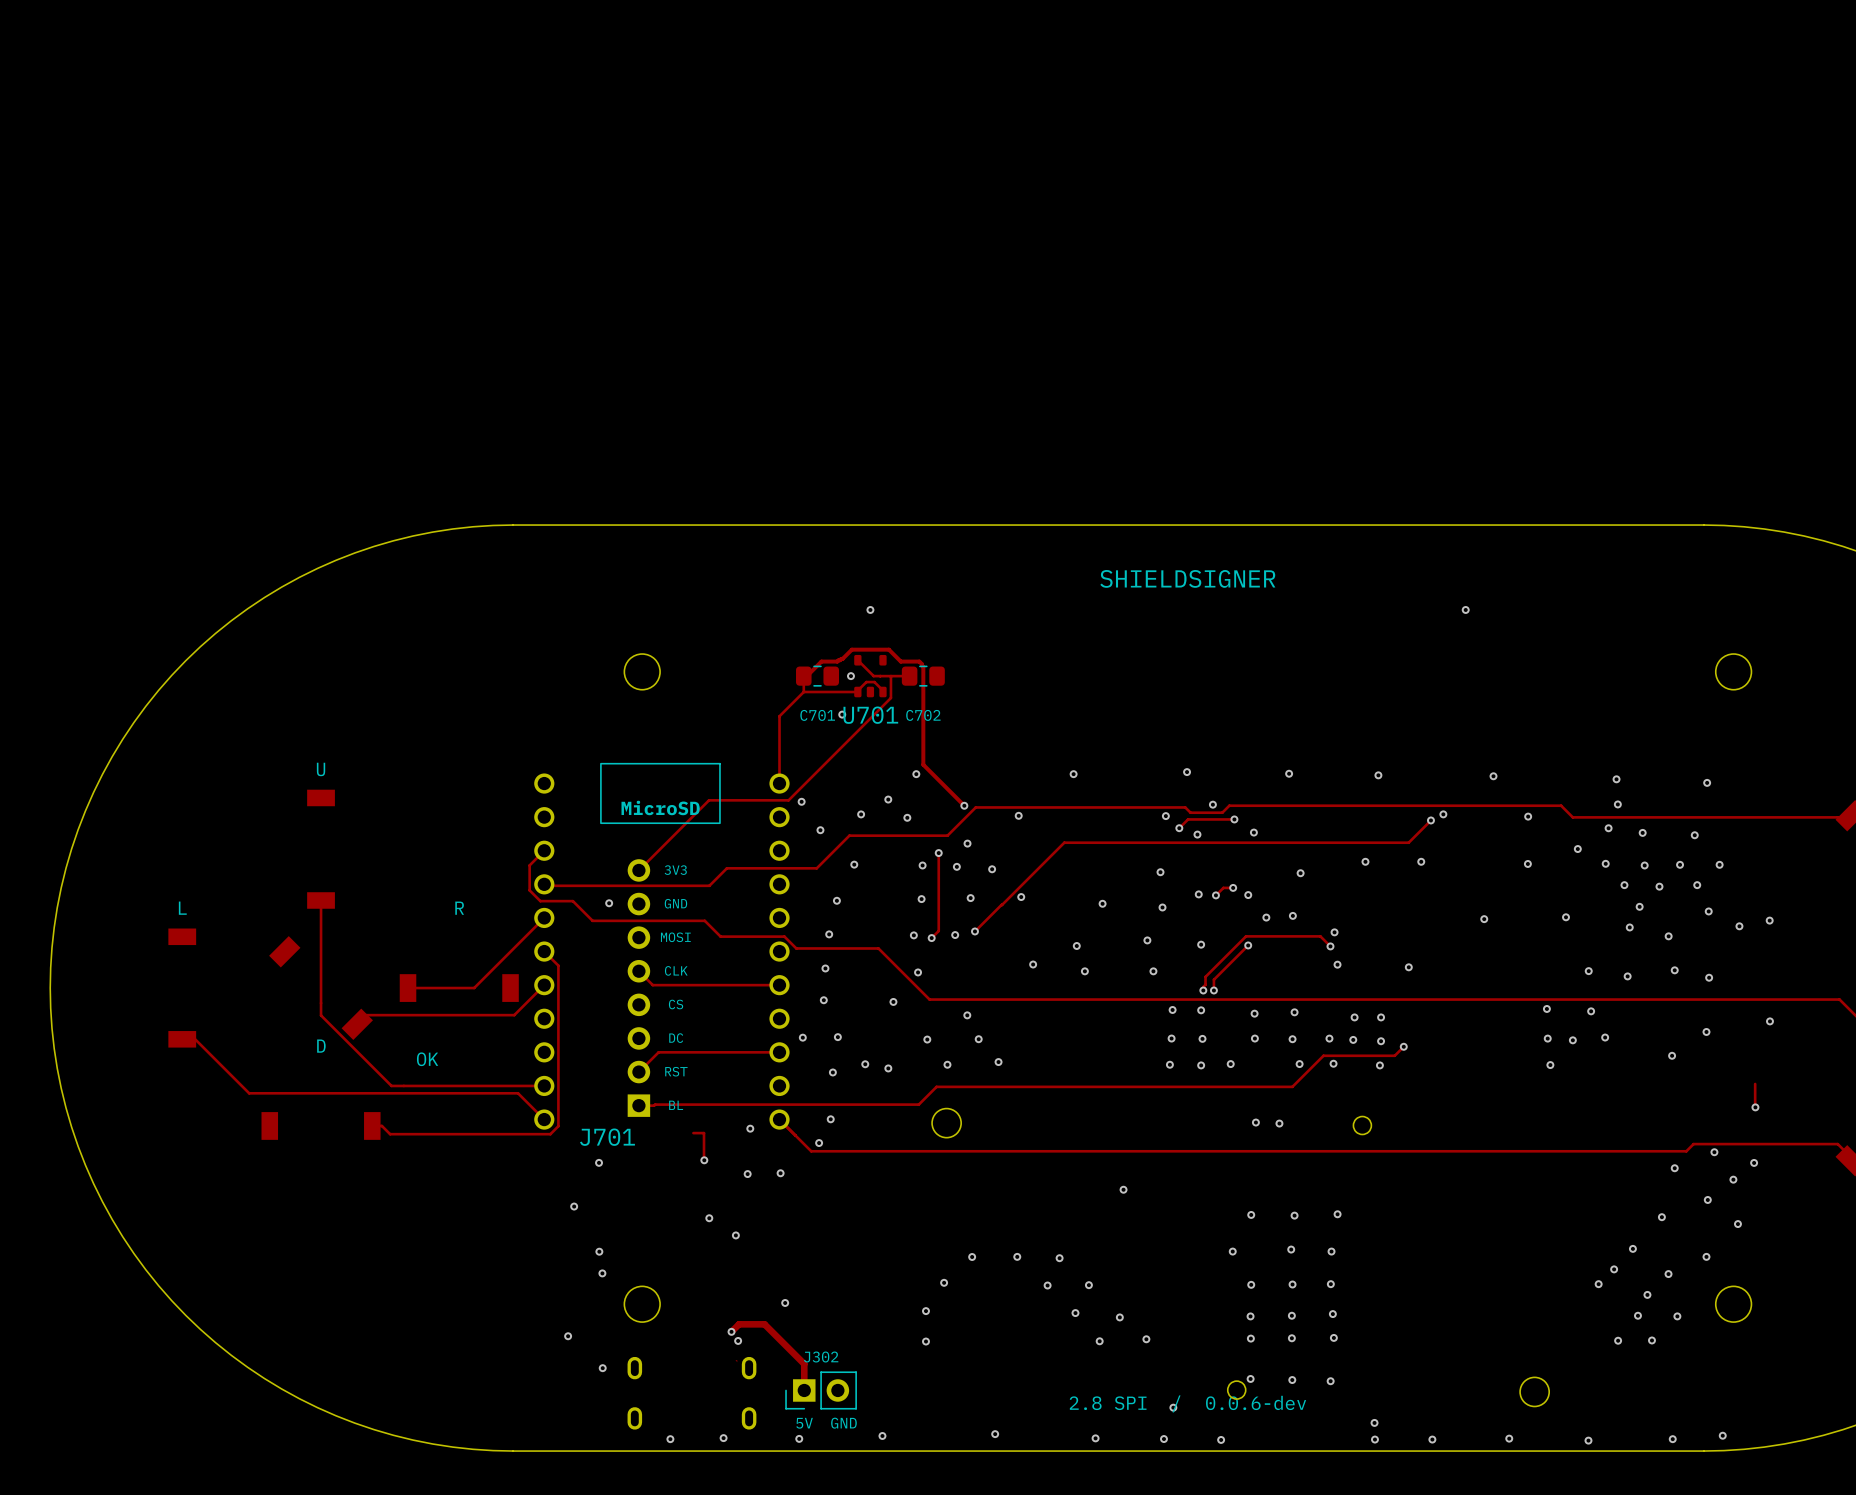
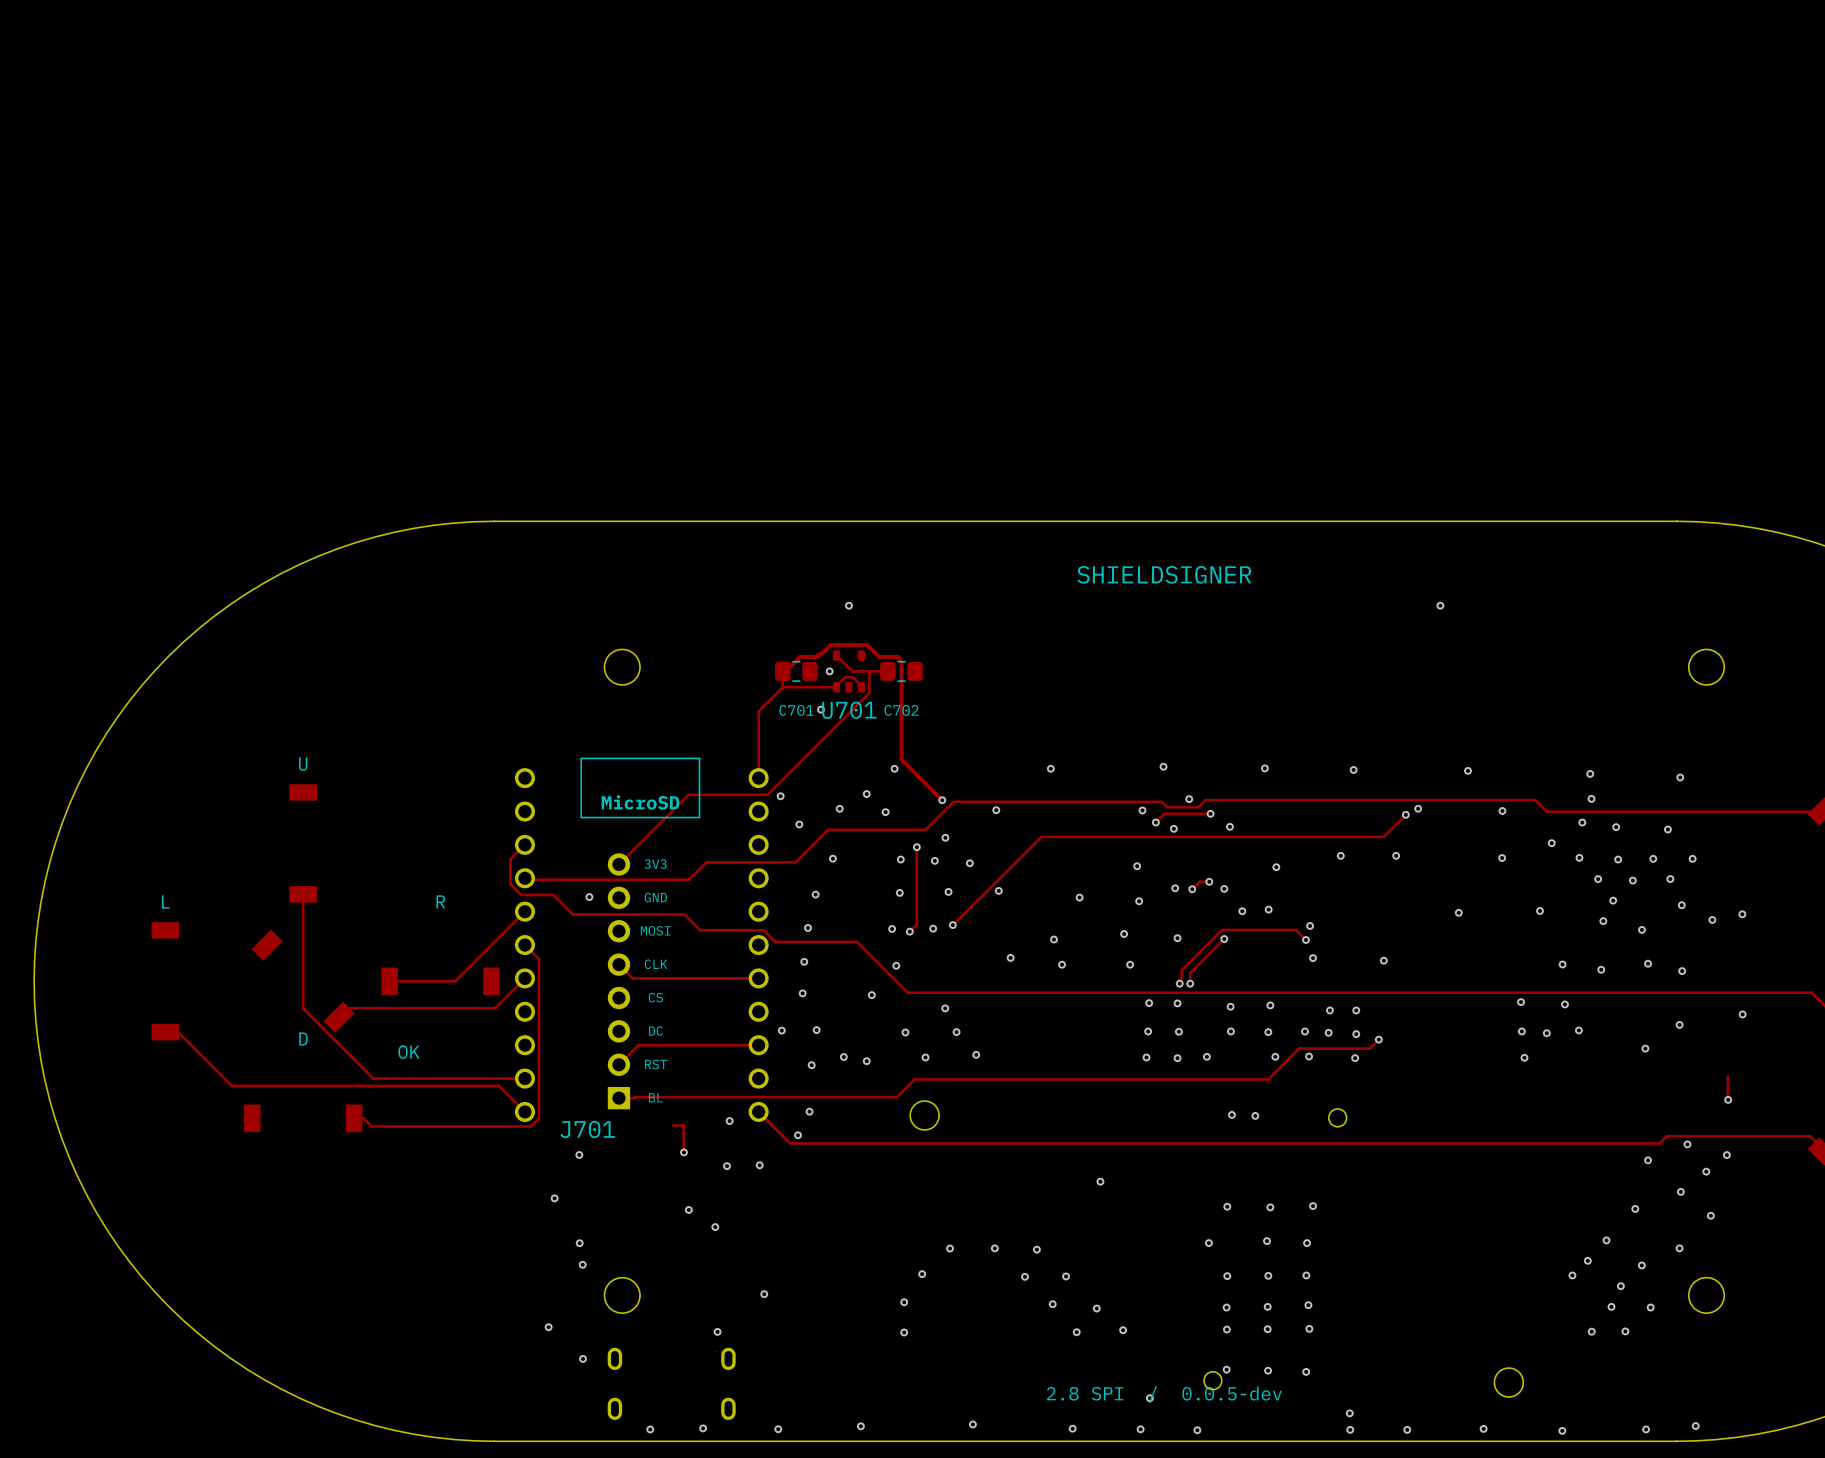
track: (731, 1331) (739, 1324) (764, 1324) (804, 1364) (804, 1390) -> none
via: (731, 1331) -> none
J302: (821, 1390) -> none
text: 2.8 SPI / 0.0.6-dev (1187, 1403) -> 2.8 SPI / 0.0.5-dev (1164, 1394)
text: 5V (804, 1423) -> none
text: GND (843, 1423) -> none

